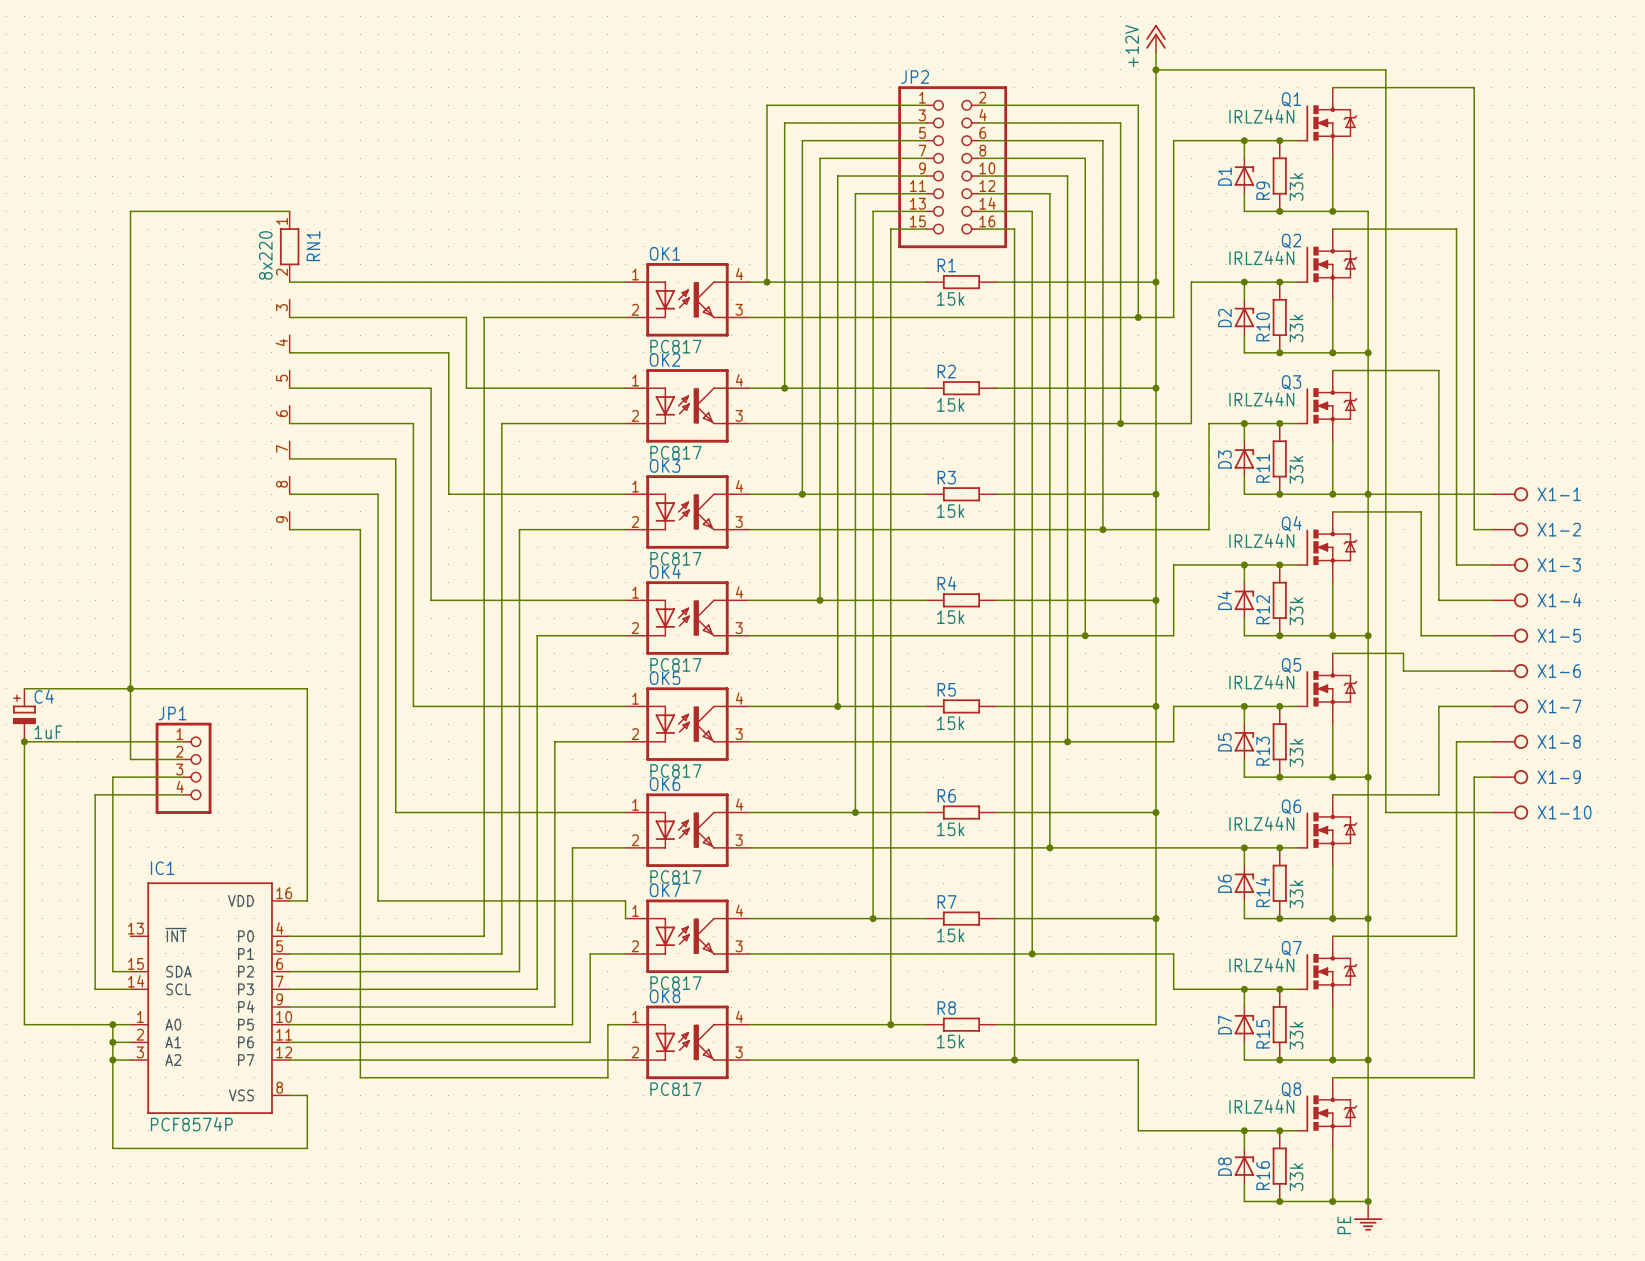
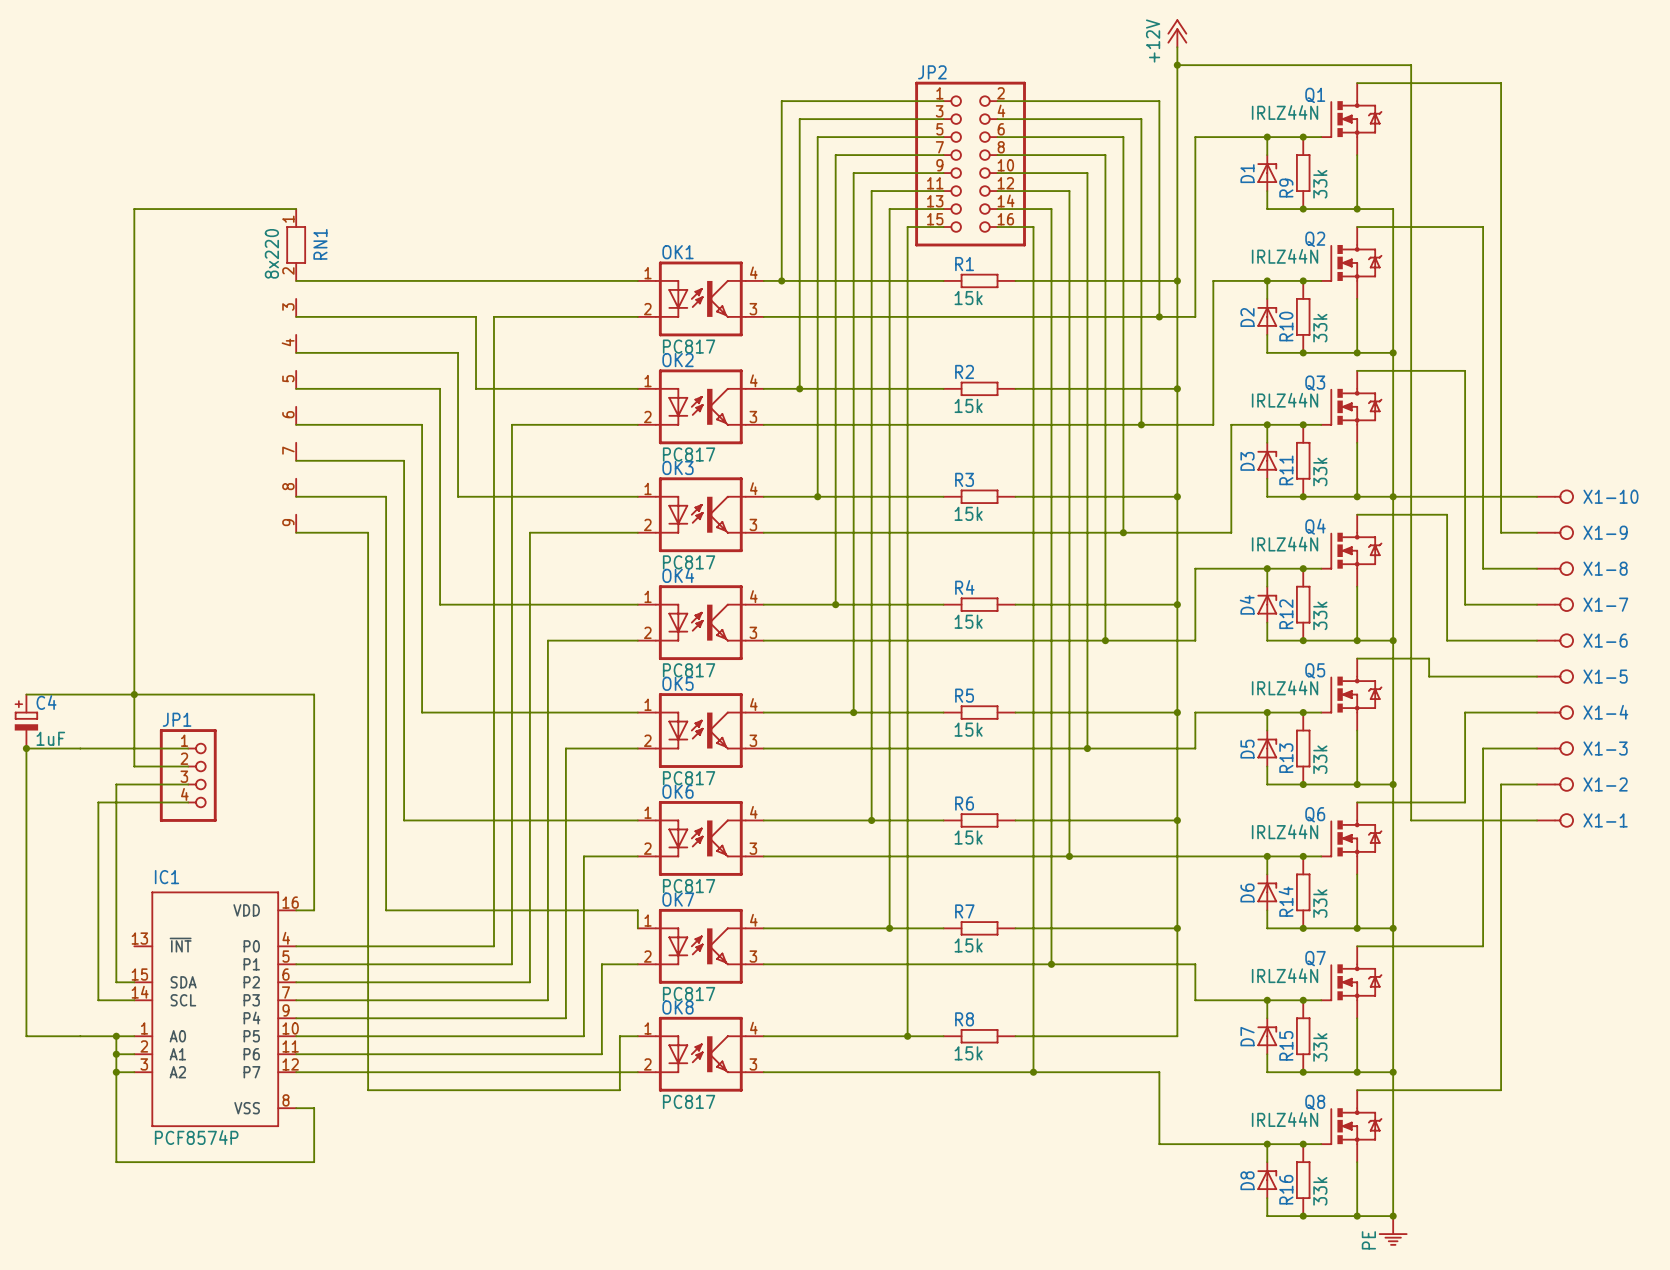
X1-1 position: (1510, 494) -> (1555, 820)
X1-2 position: (1510, 529) -> (1555, 784)
X1-3 position: (1510, 564) -> (1555, 748)
X1-4 position: (1510, 600) -> (1555, 712)
X1-5 position: (1510, 635) -> (1555, 676)
X1-6 position: (1510, 671) -> (1555, 640)
X1-7 position: (1510, 706) -> (1555, 604)
X1-8 position: (1510, 741) -> (1555, 568)
X1-9 position: (1510, 777) -> (1555, 532)
X1-10 position: (1510, 812) -> (1555, 496)

